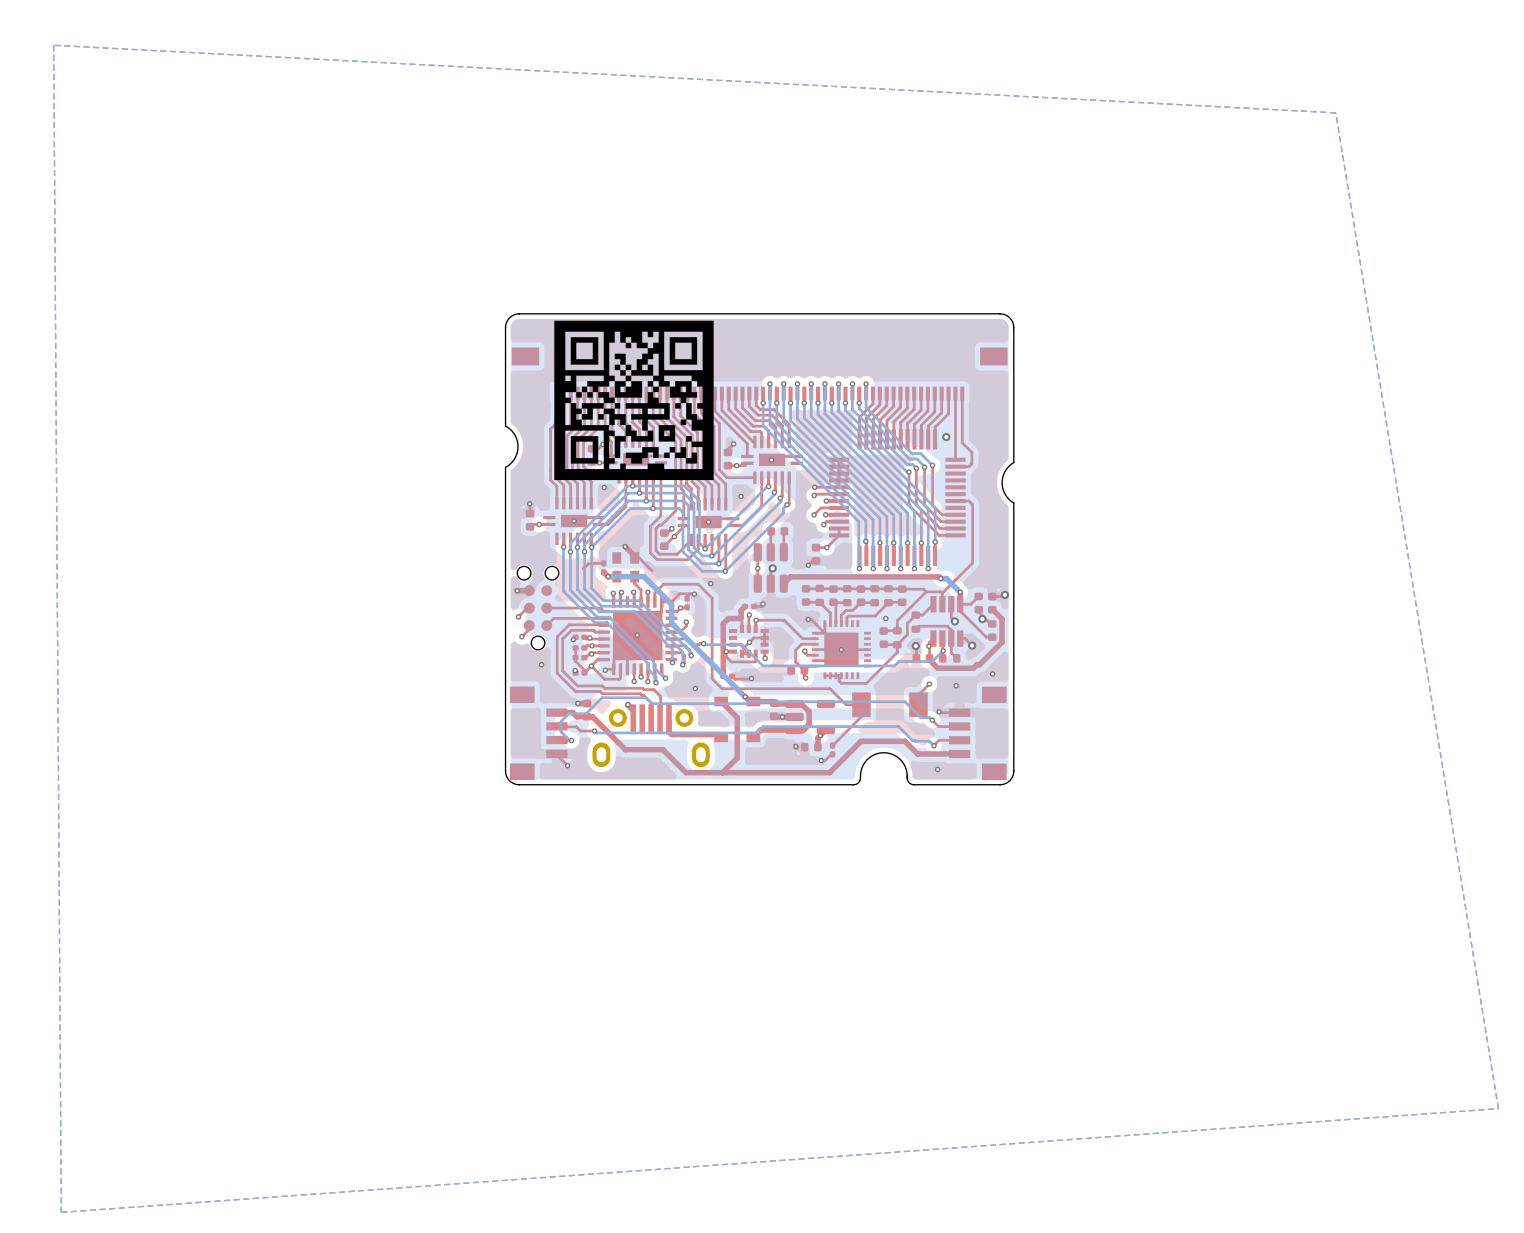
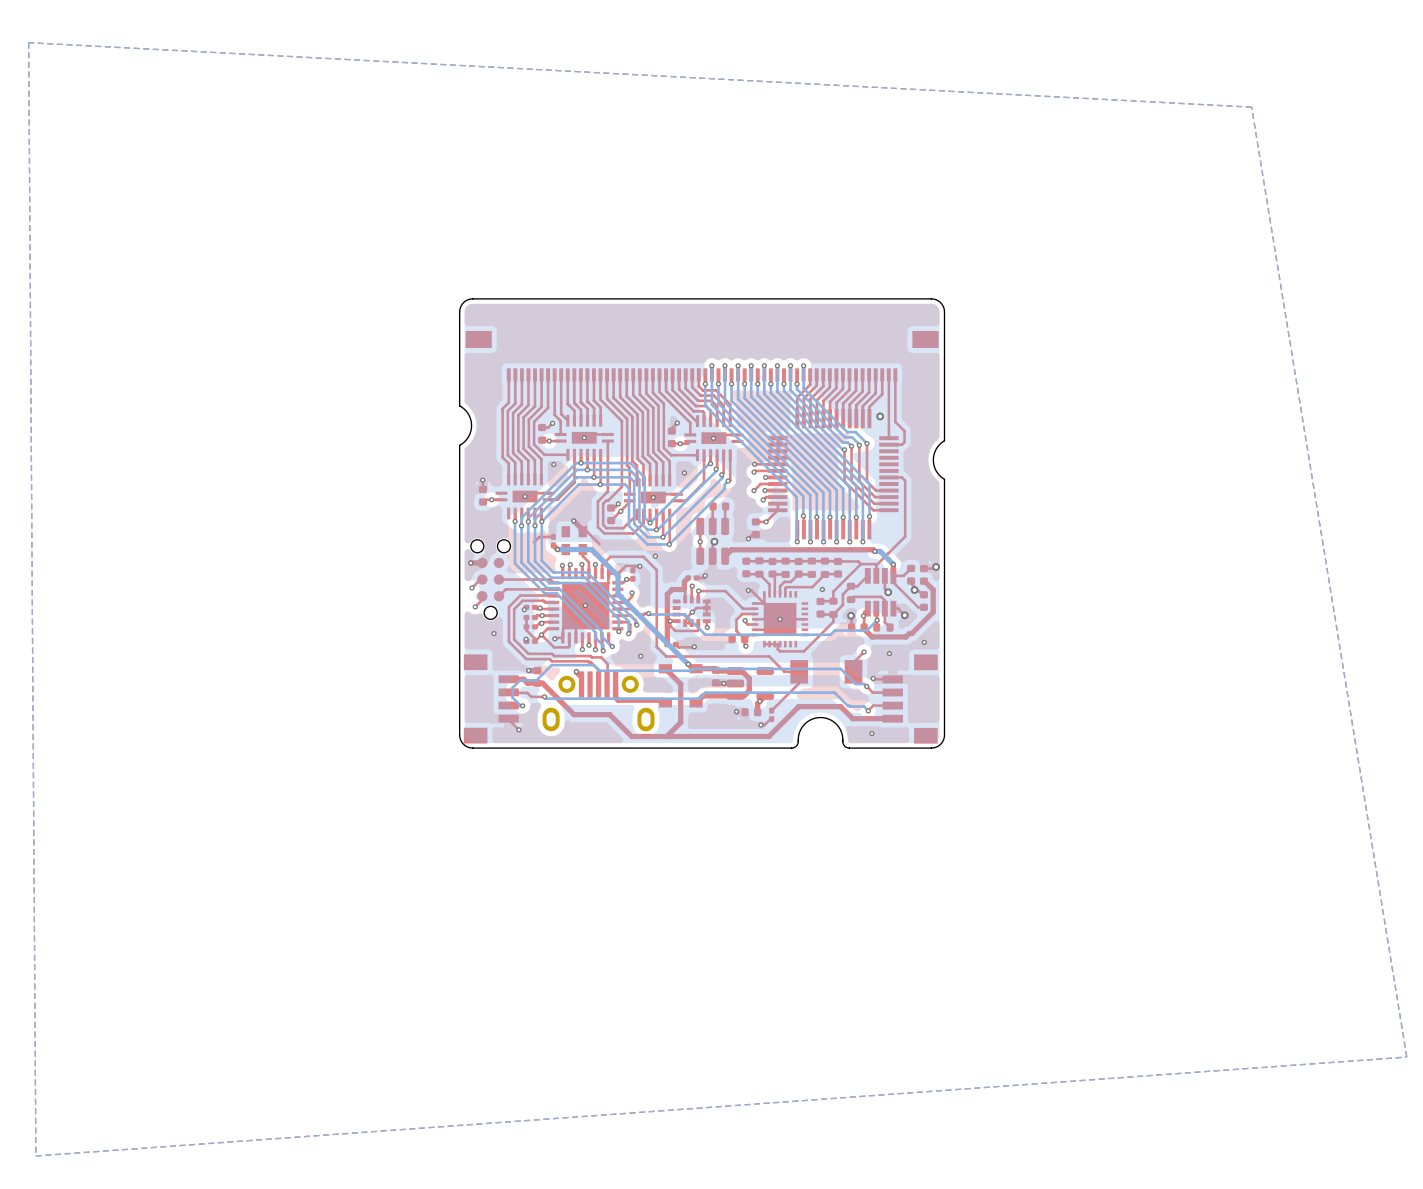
drawing: [554, 320, 714, 481] -> none

